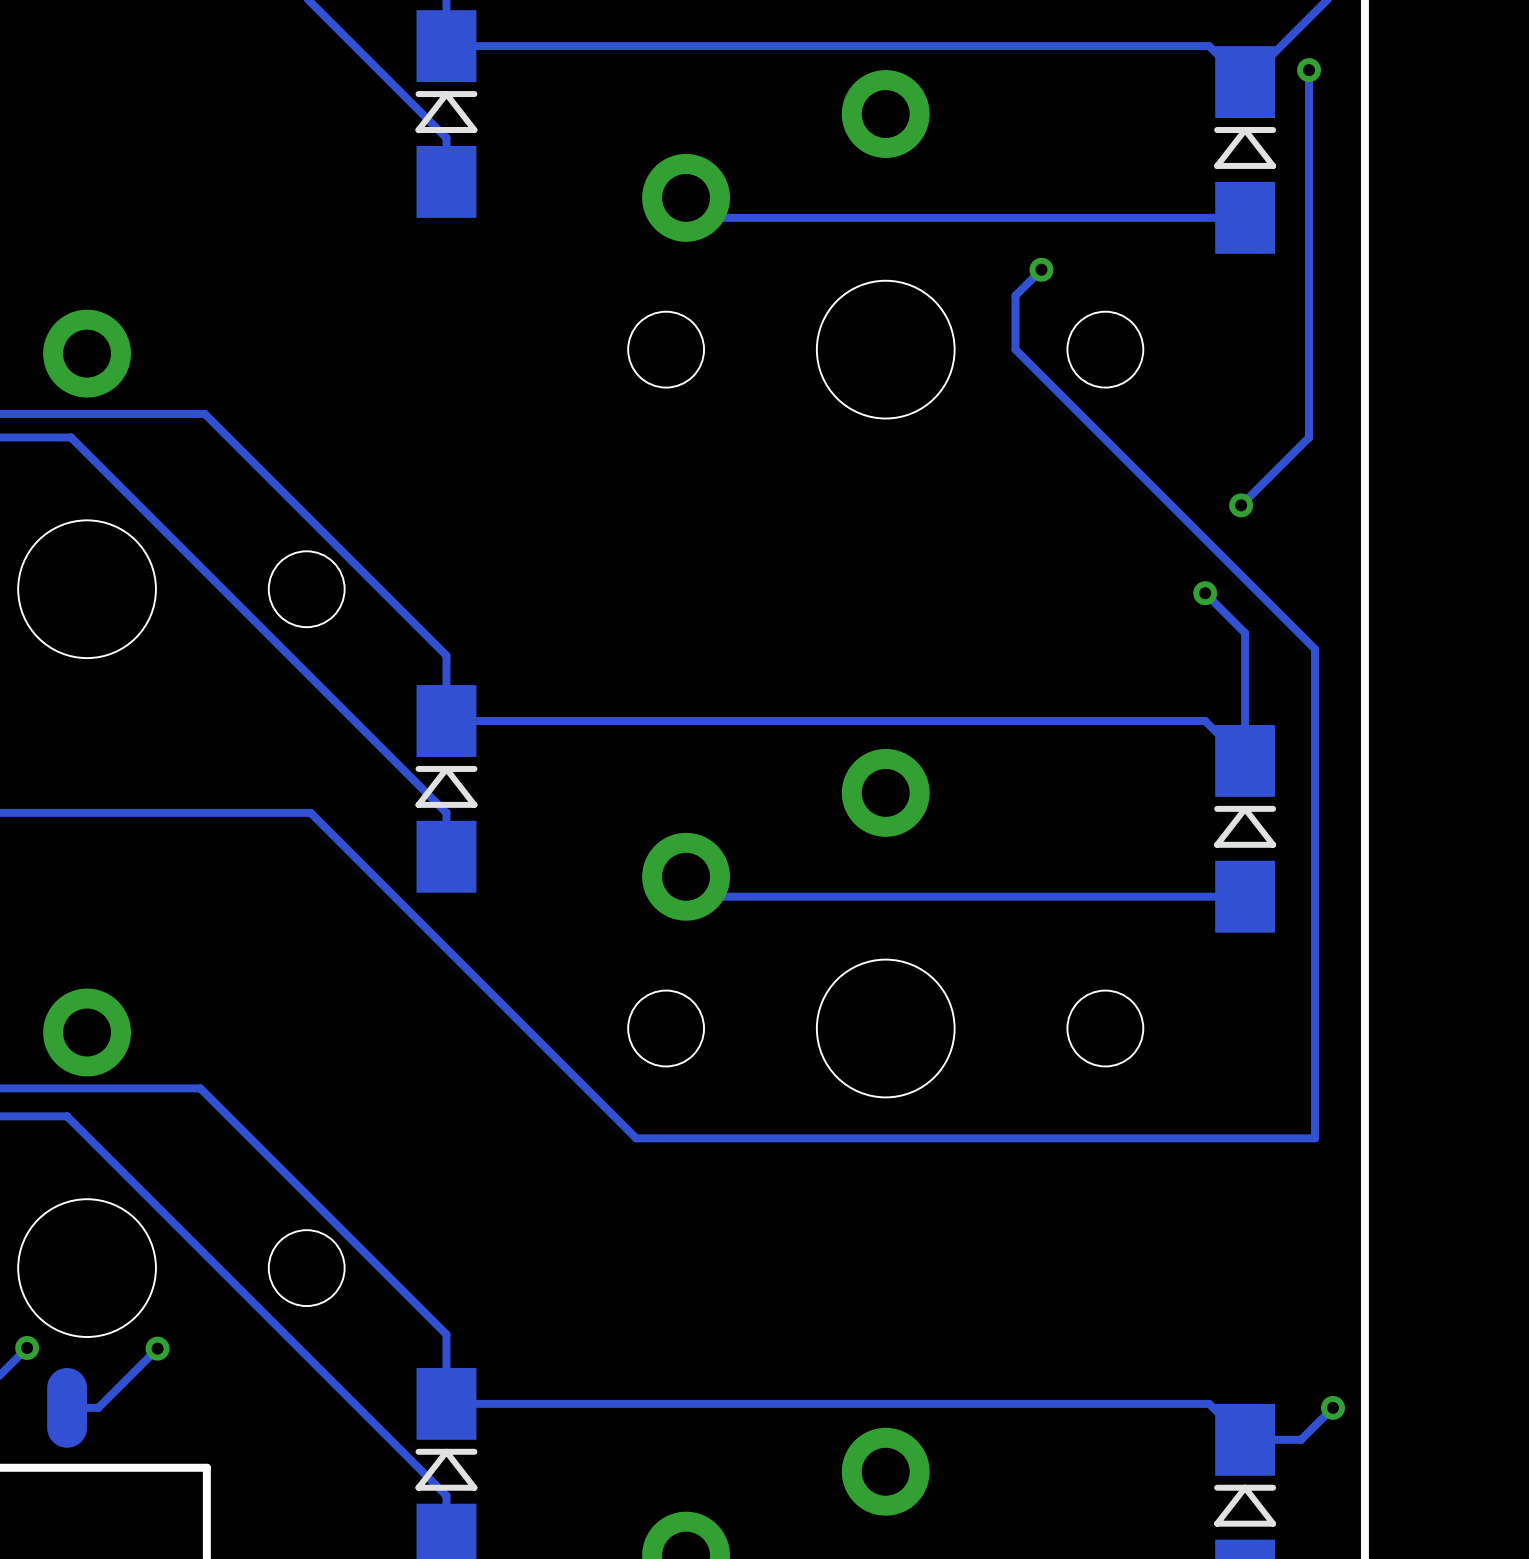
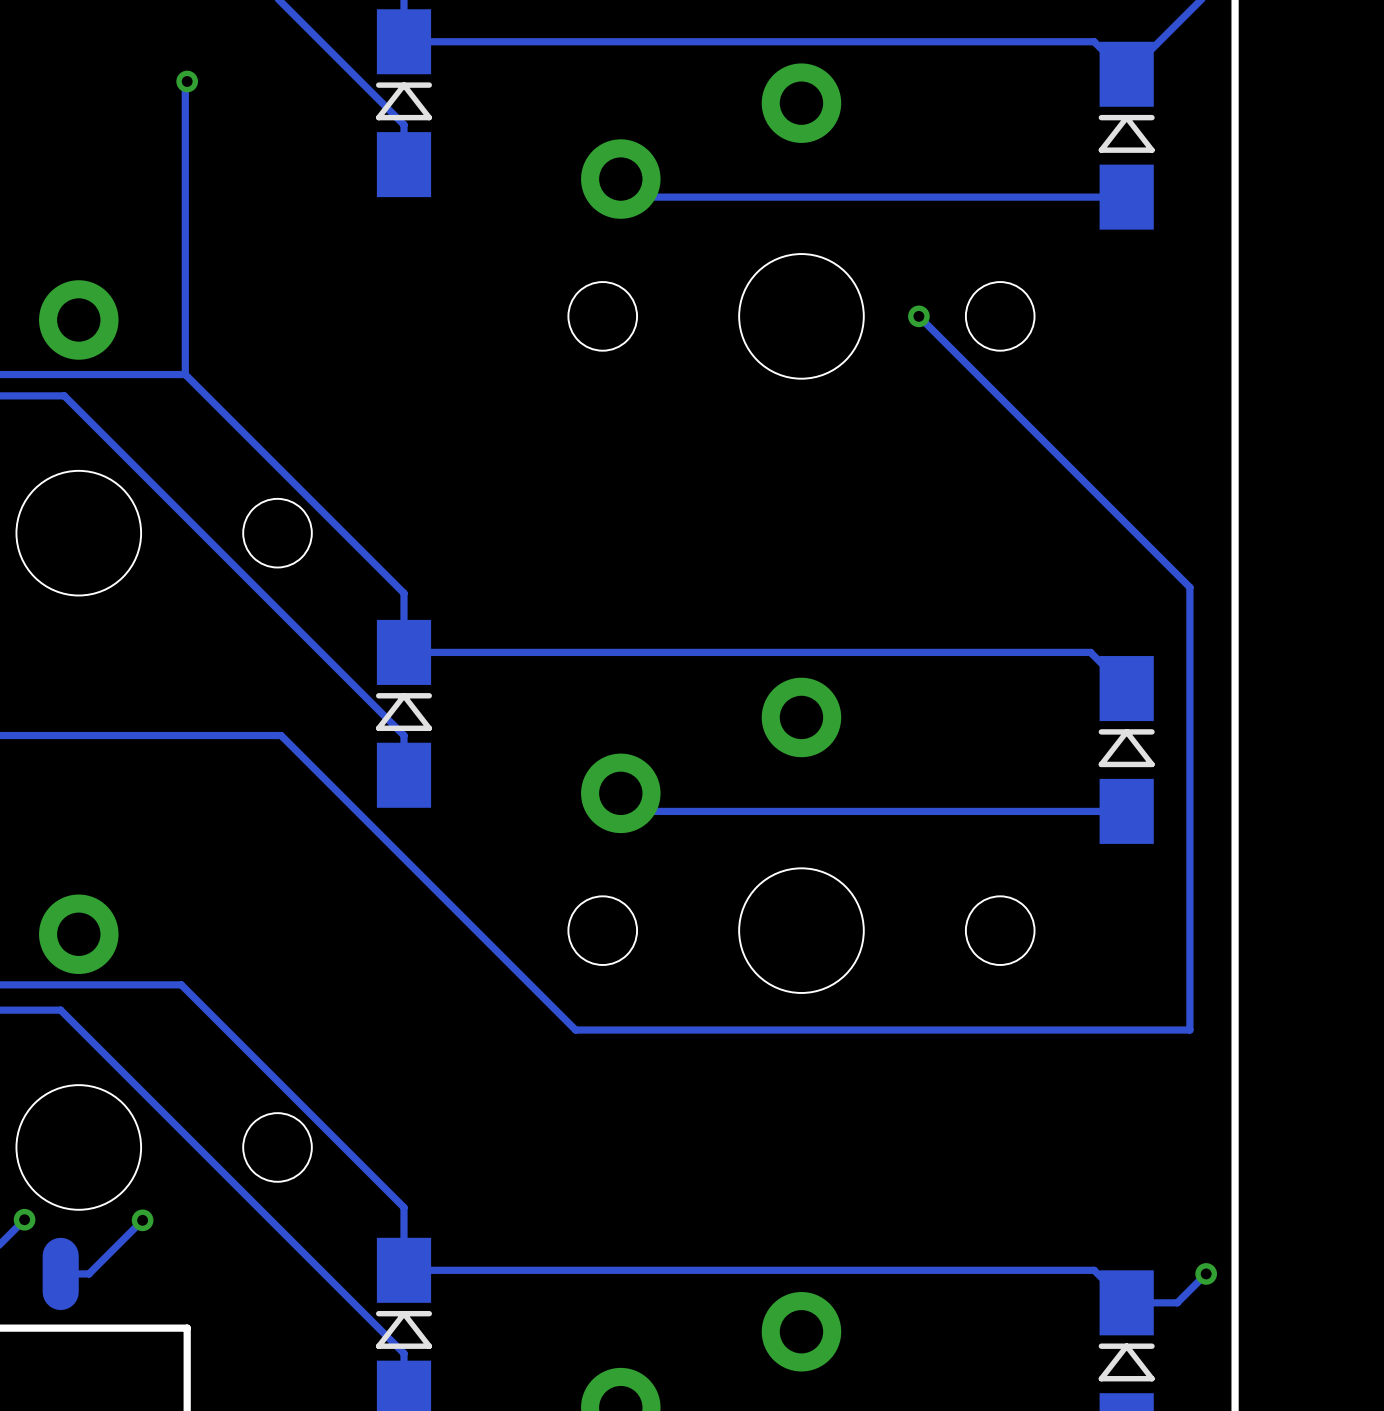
track: (1309, 70) (1309, 437) (1241, 505) -> none
via: (1309, 70) -> none
track: none -> (187, 81) (185, 83) (185, 374)
via: none -> (187, 81)
track: (1041, 269) (1015, 295) (1015, 349) -> none
via position: (1041, 269) -> (918, 316)
via: (1241, 505) -> none
track: (1205, 593) (1245, 633) (1245, 760) -> none
via: (1205, 593) -> none

